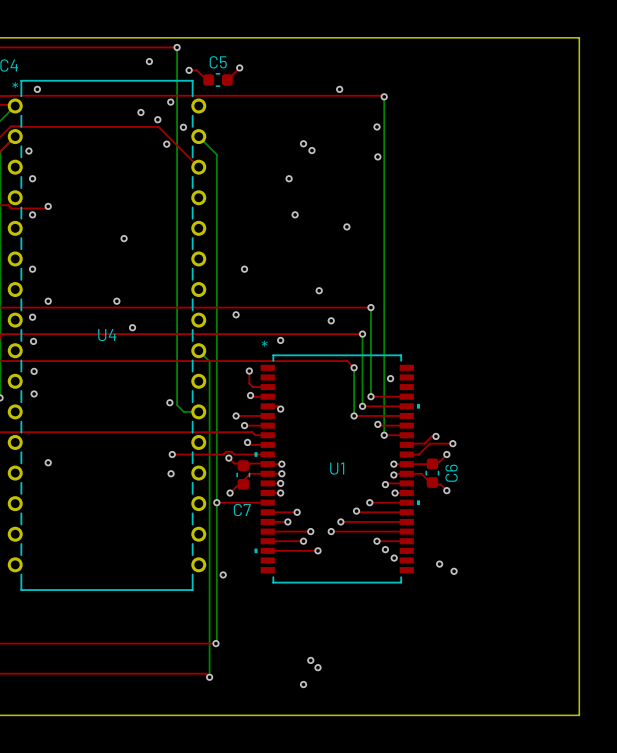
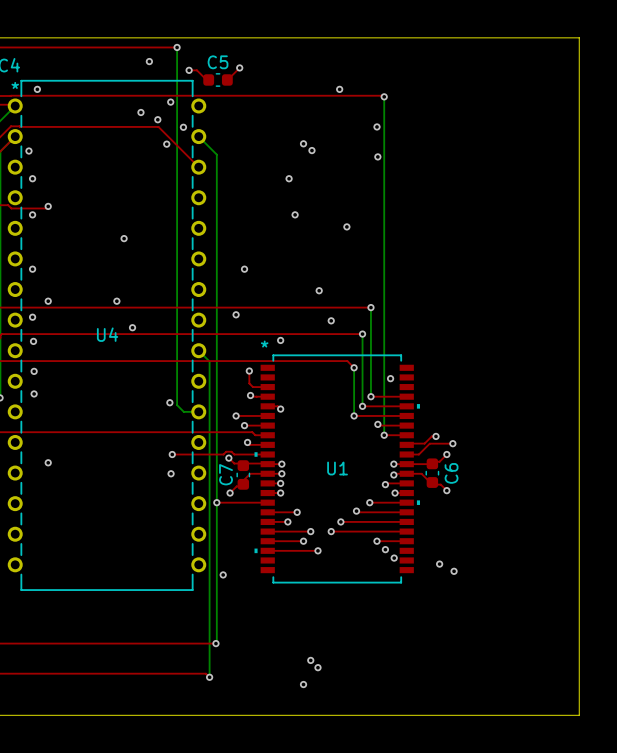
C7 name rotation: 0° (242, 509) -> 90° counterclockwise (226, 474)
C7 name position: C7 (242, 509) -> C7 (226, 474)

